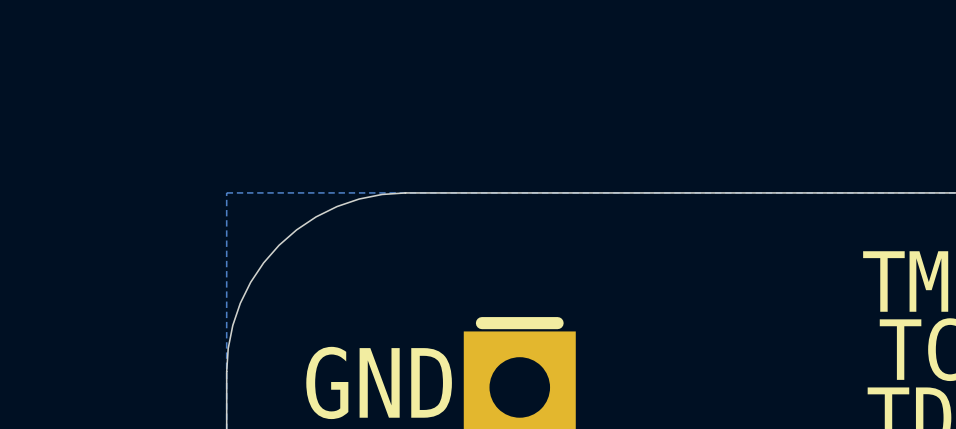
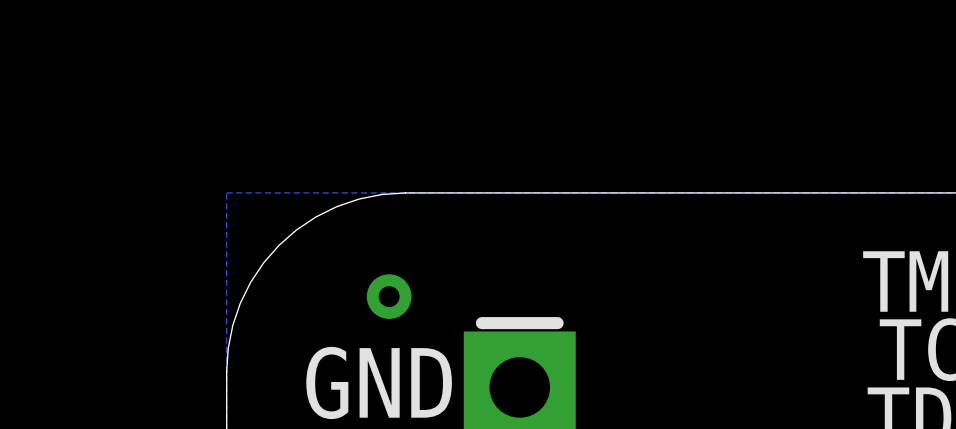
via: none -> (389, 296)

